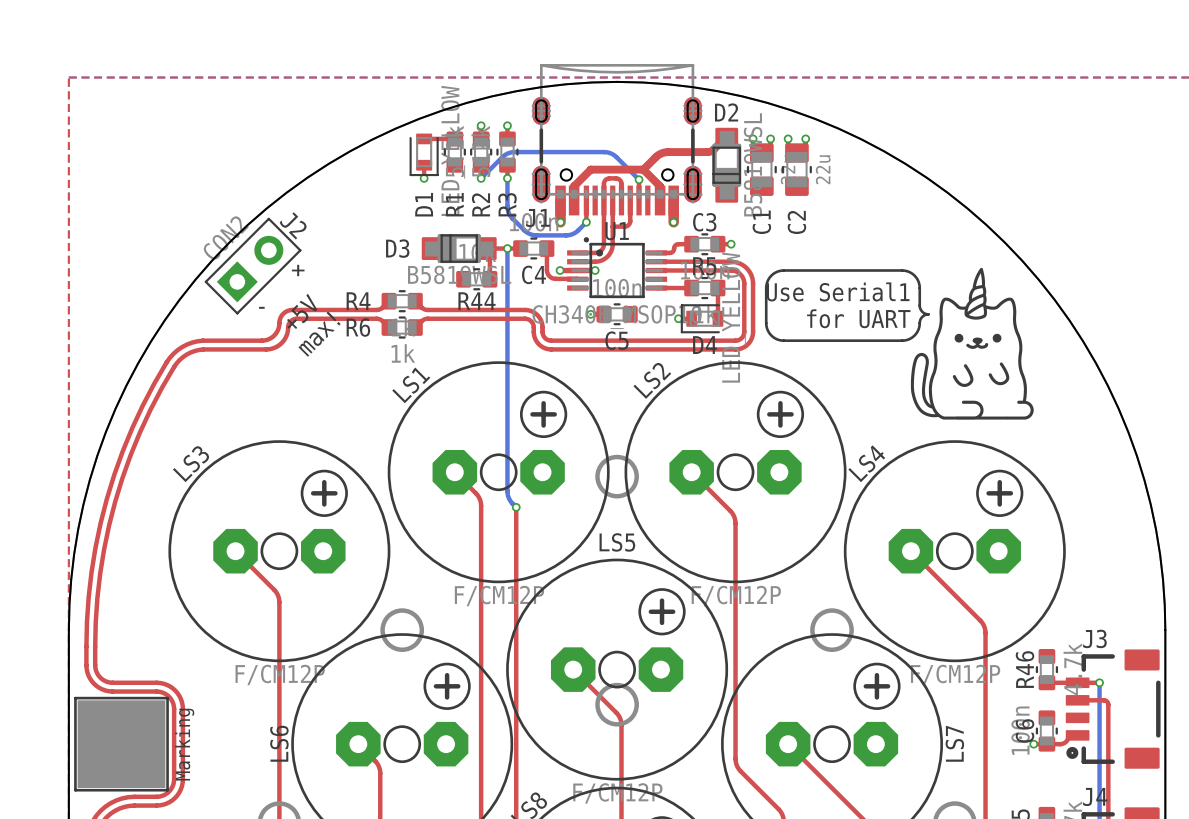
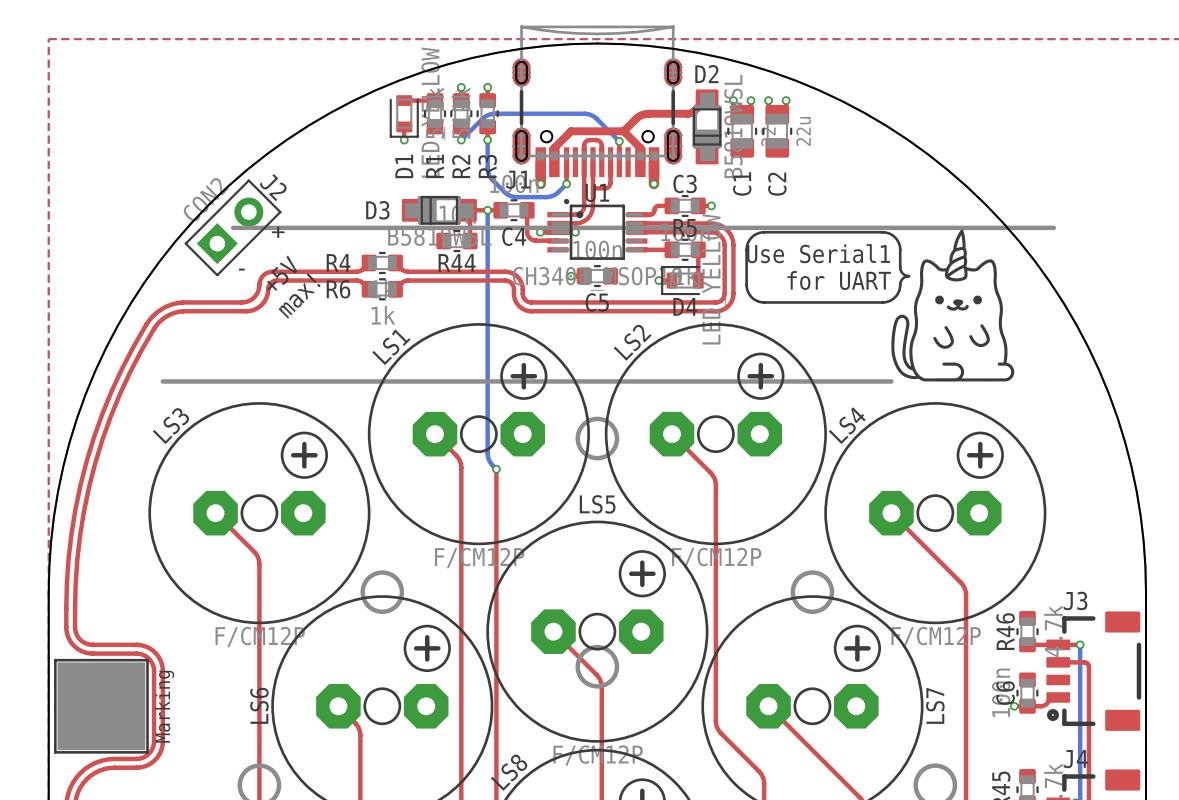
line: none -> (233, 227) (1053, 227)
line: none -> (162, 381) (891, 381)

